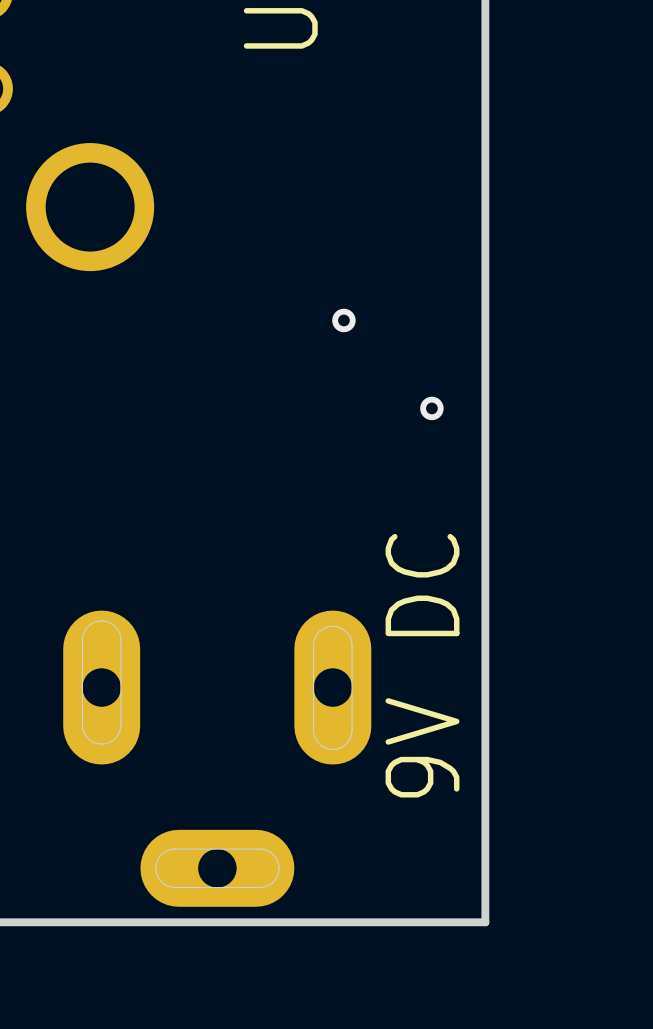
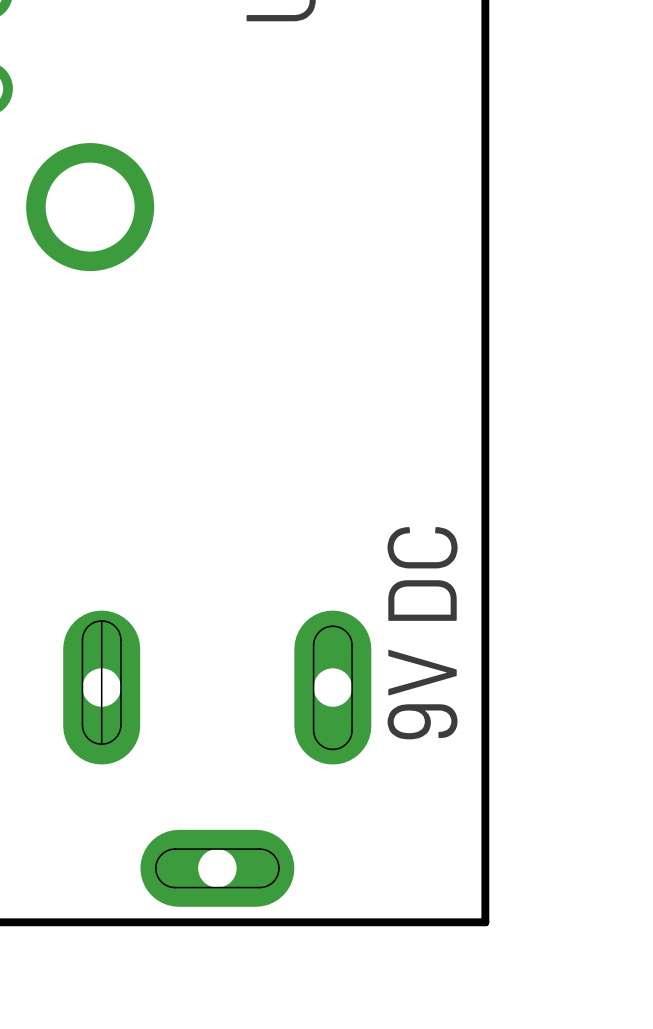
via: (343, 320) -> none
via: (431, 408) -> none
part footprint: [63, 610, 372, 907] -> [63, 610, 372, 907]

